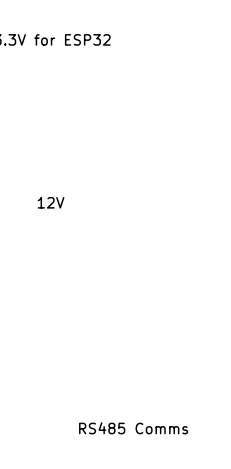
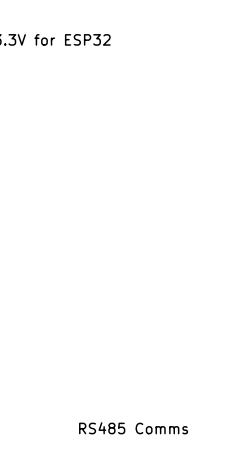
label: 12V (51, 202) -> none

